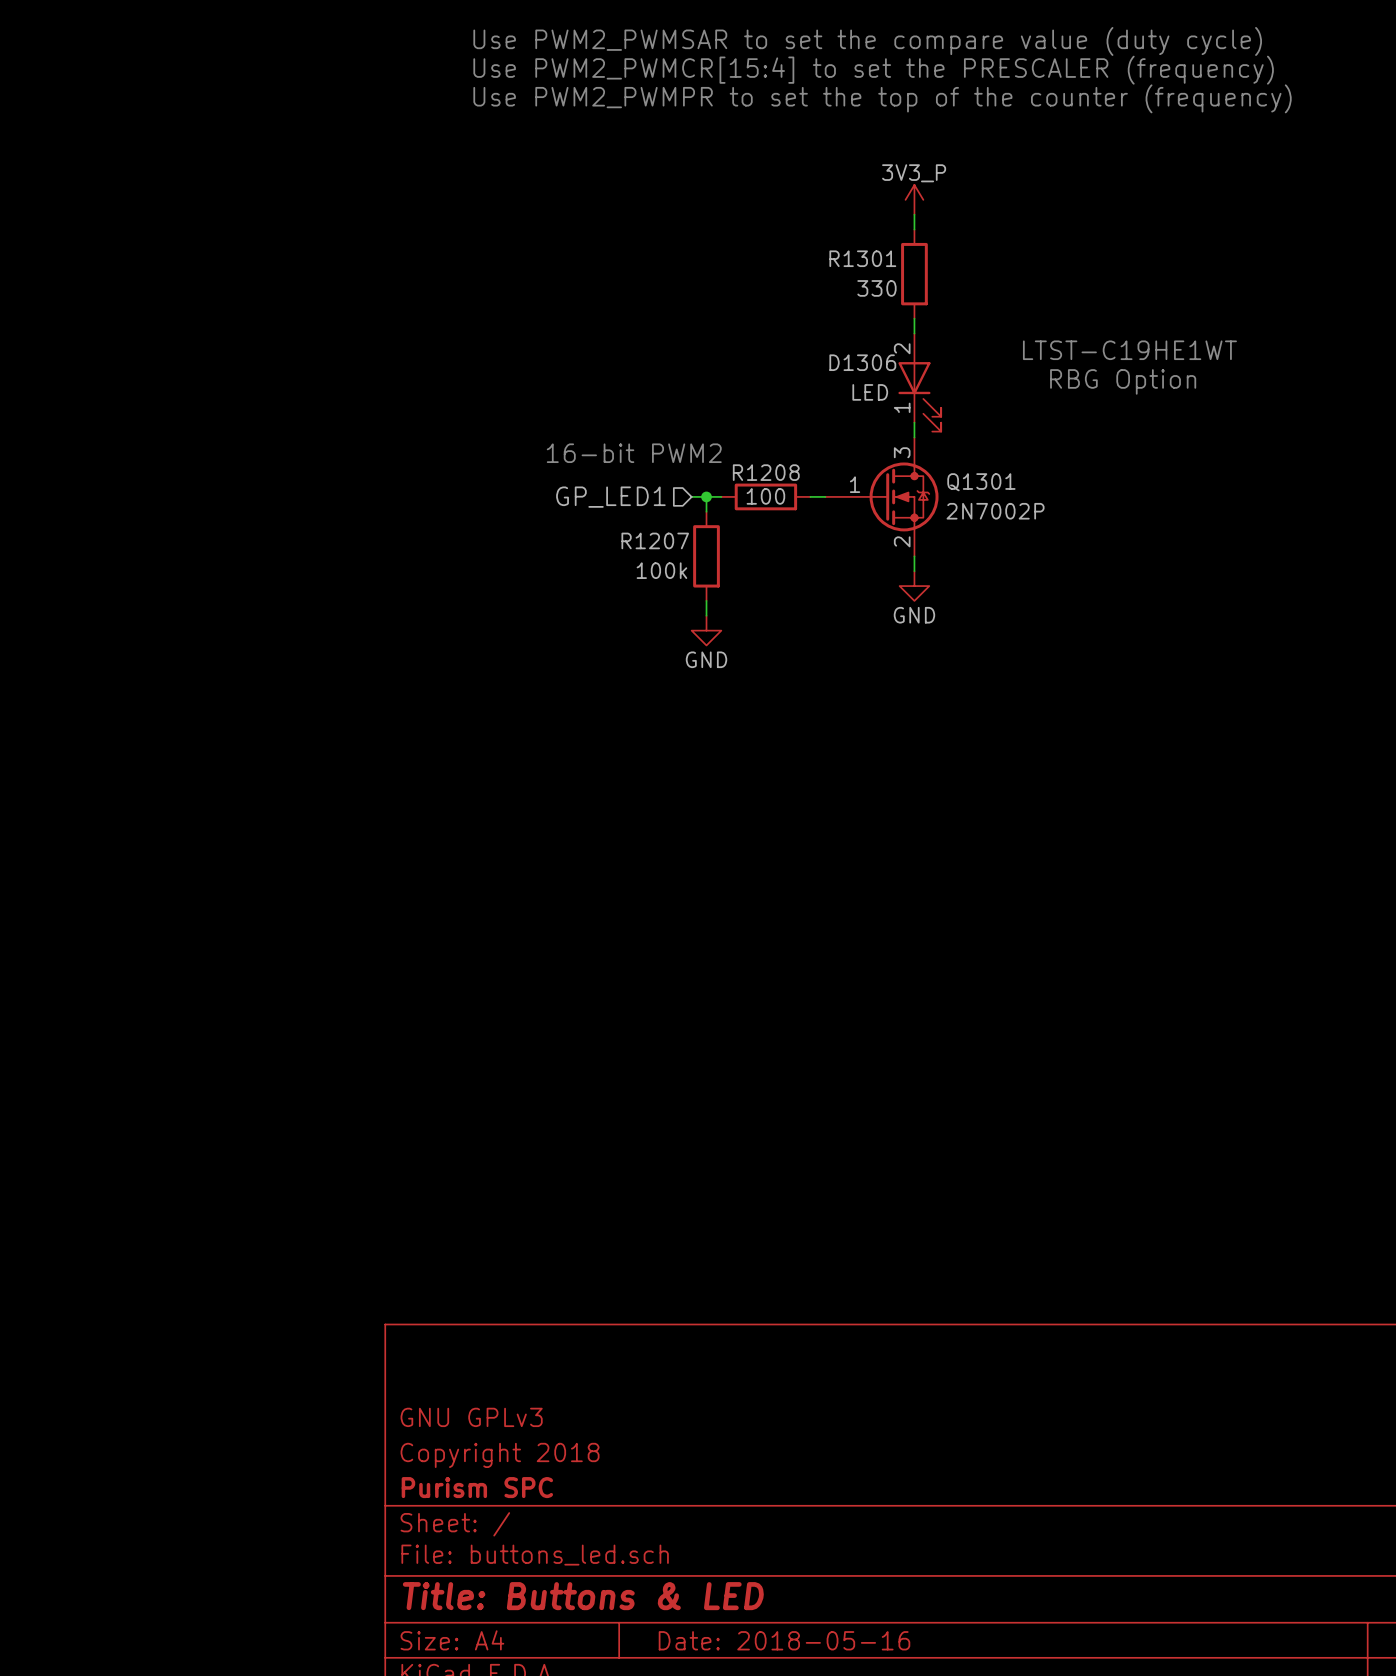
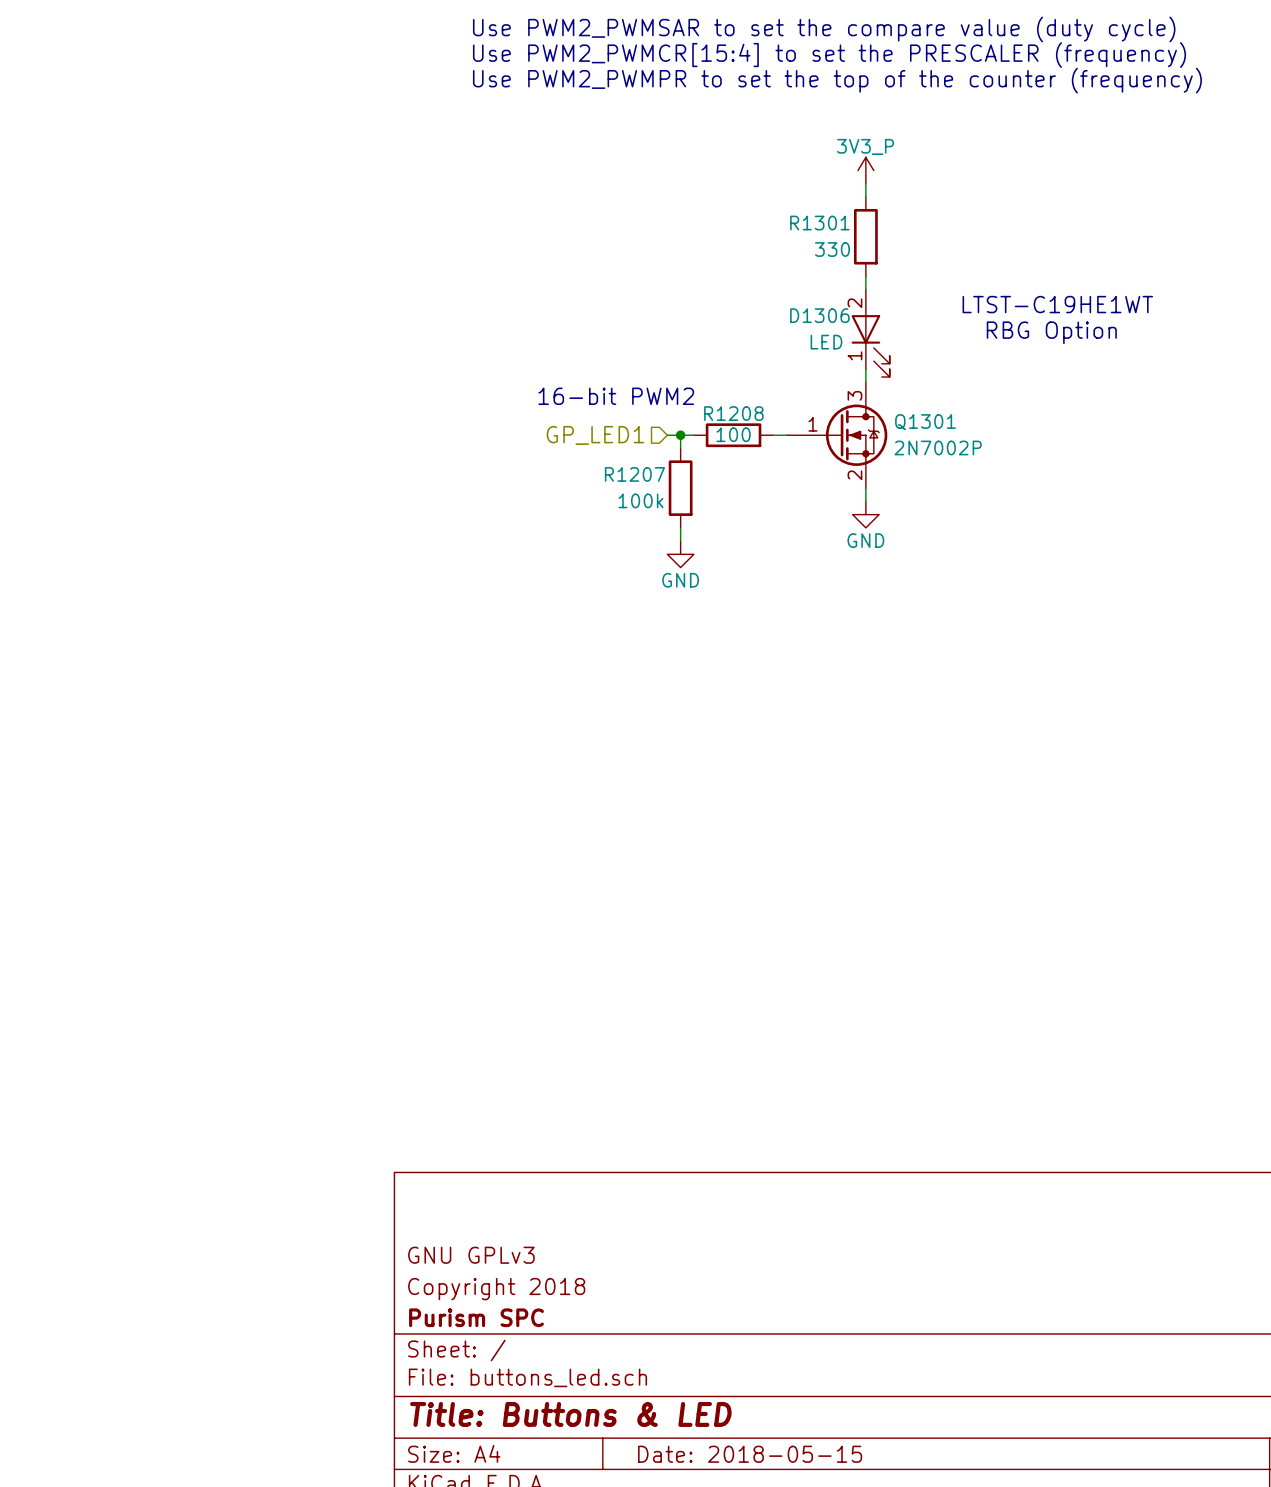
title block: Date: 2018-05-16 (784, 1640) -> Date: 2018-05-15 (750, 1454)

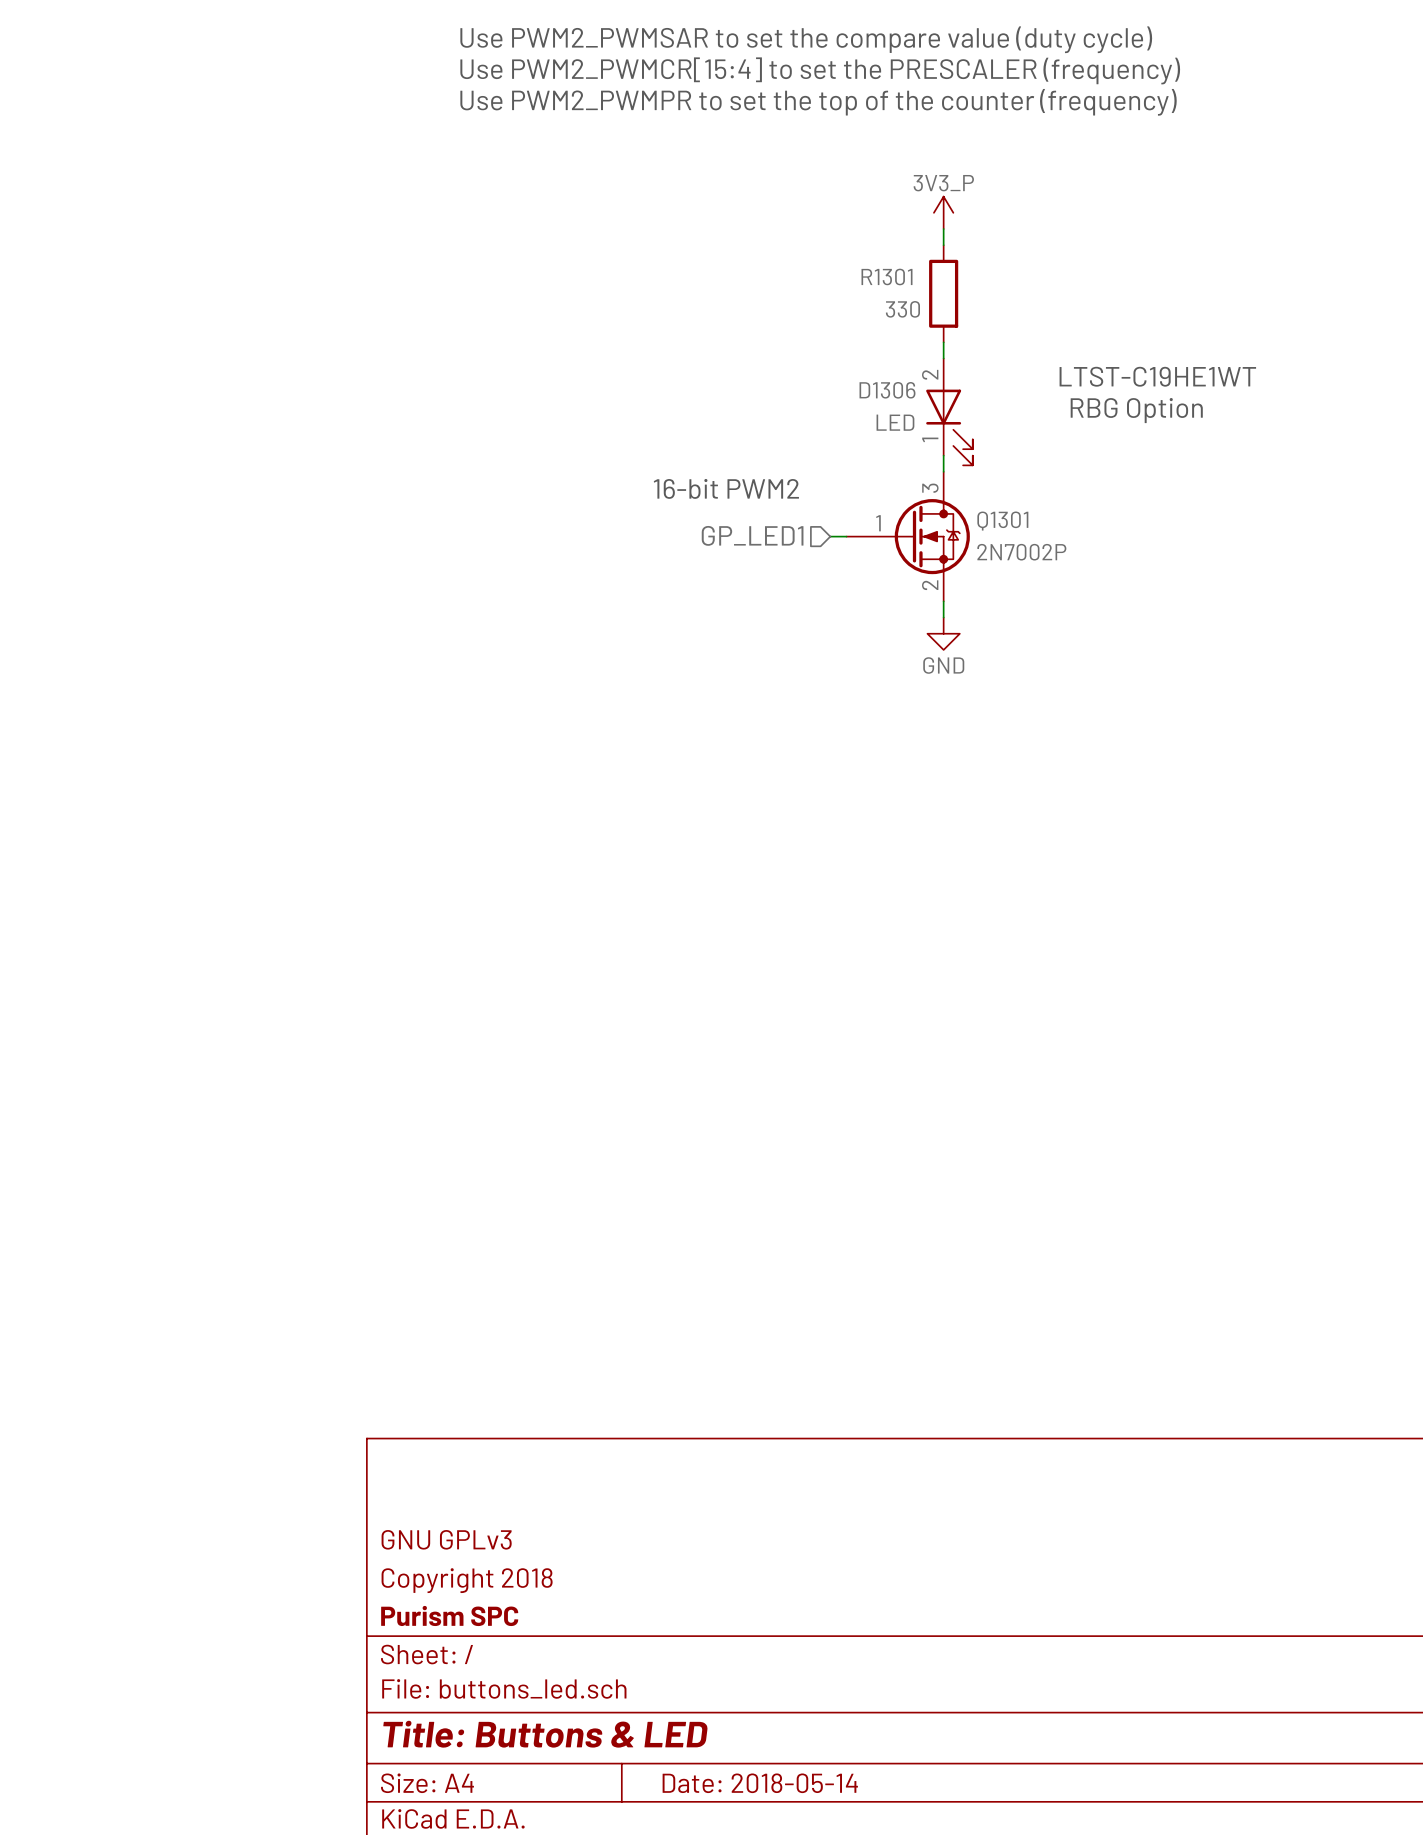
text position: 16-bit PWM2 (616, 396) -> 16-bit PWM2 (726, 488)
hierarchical label position: GP_LED1 (595, 435) -> GP_LED1 (752, 535)
wire: (667, 435) (693, 435) -> none
wire: (680, 435) (680, 448) -> none
junction: (680, 435) -> none
R1208: 100 (733, 435) -> none
R1207: 100k (680, 488) -> none
wire: (680, 527) (680, 541) -> none
power symbol: GND (680, 554) -> none
title block: Date: 2018-05-15 (750, 1454) -> Date: 2018-05-14 (760, 1783)

